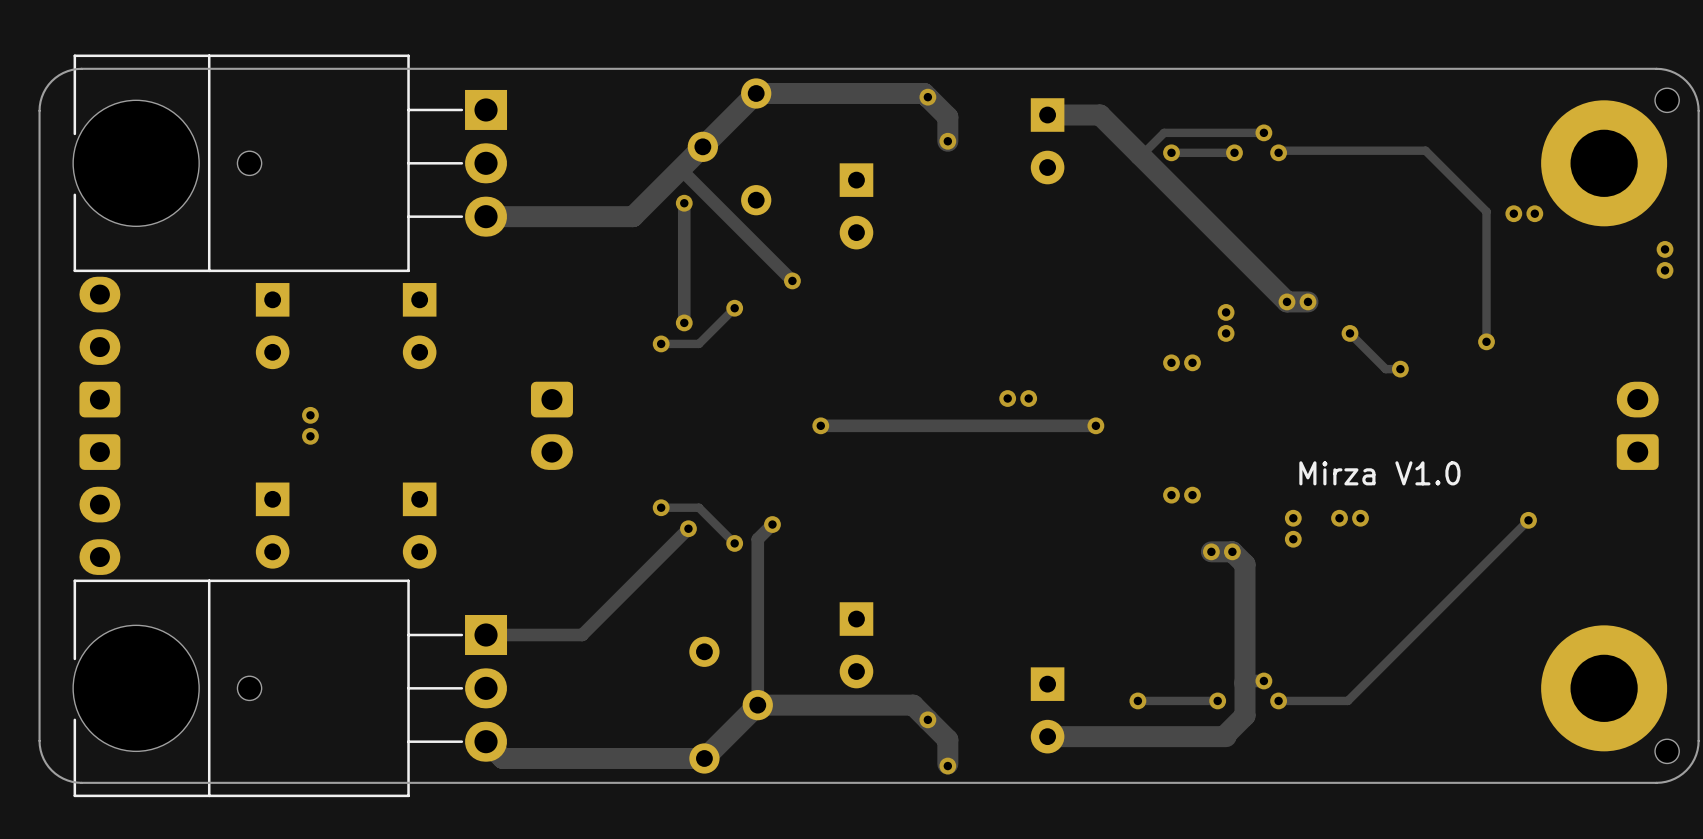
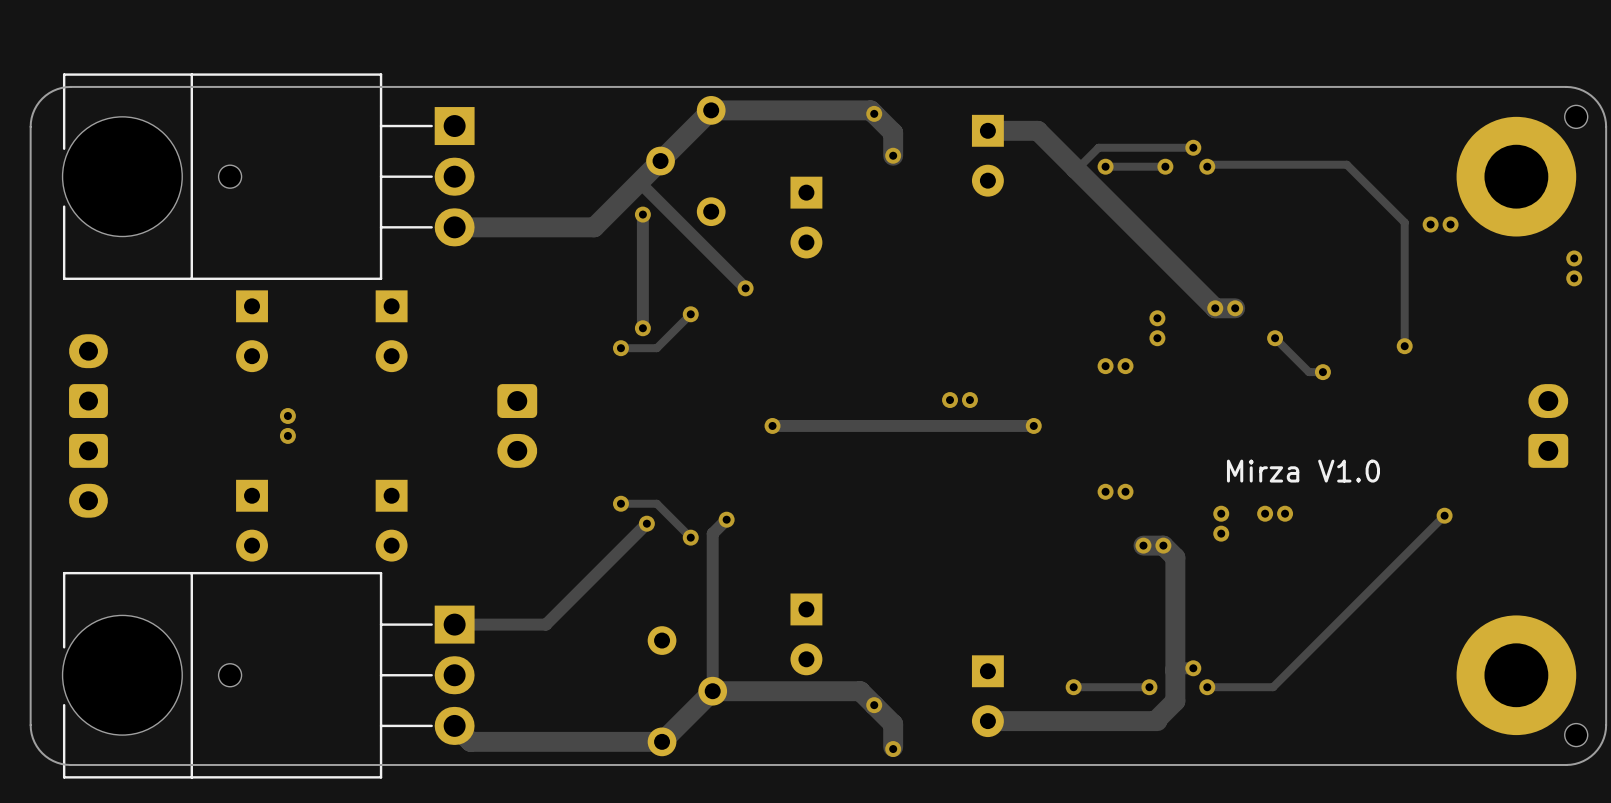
part footprint: [79, 276, 121, 575] -> [69, 334, 108, 518]

